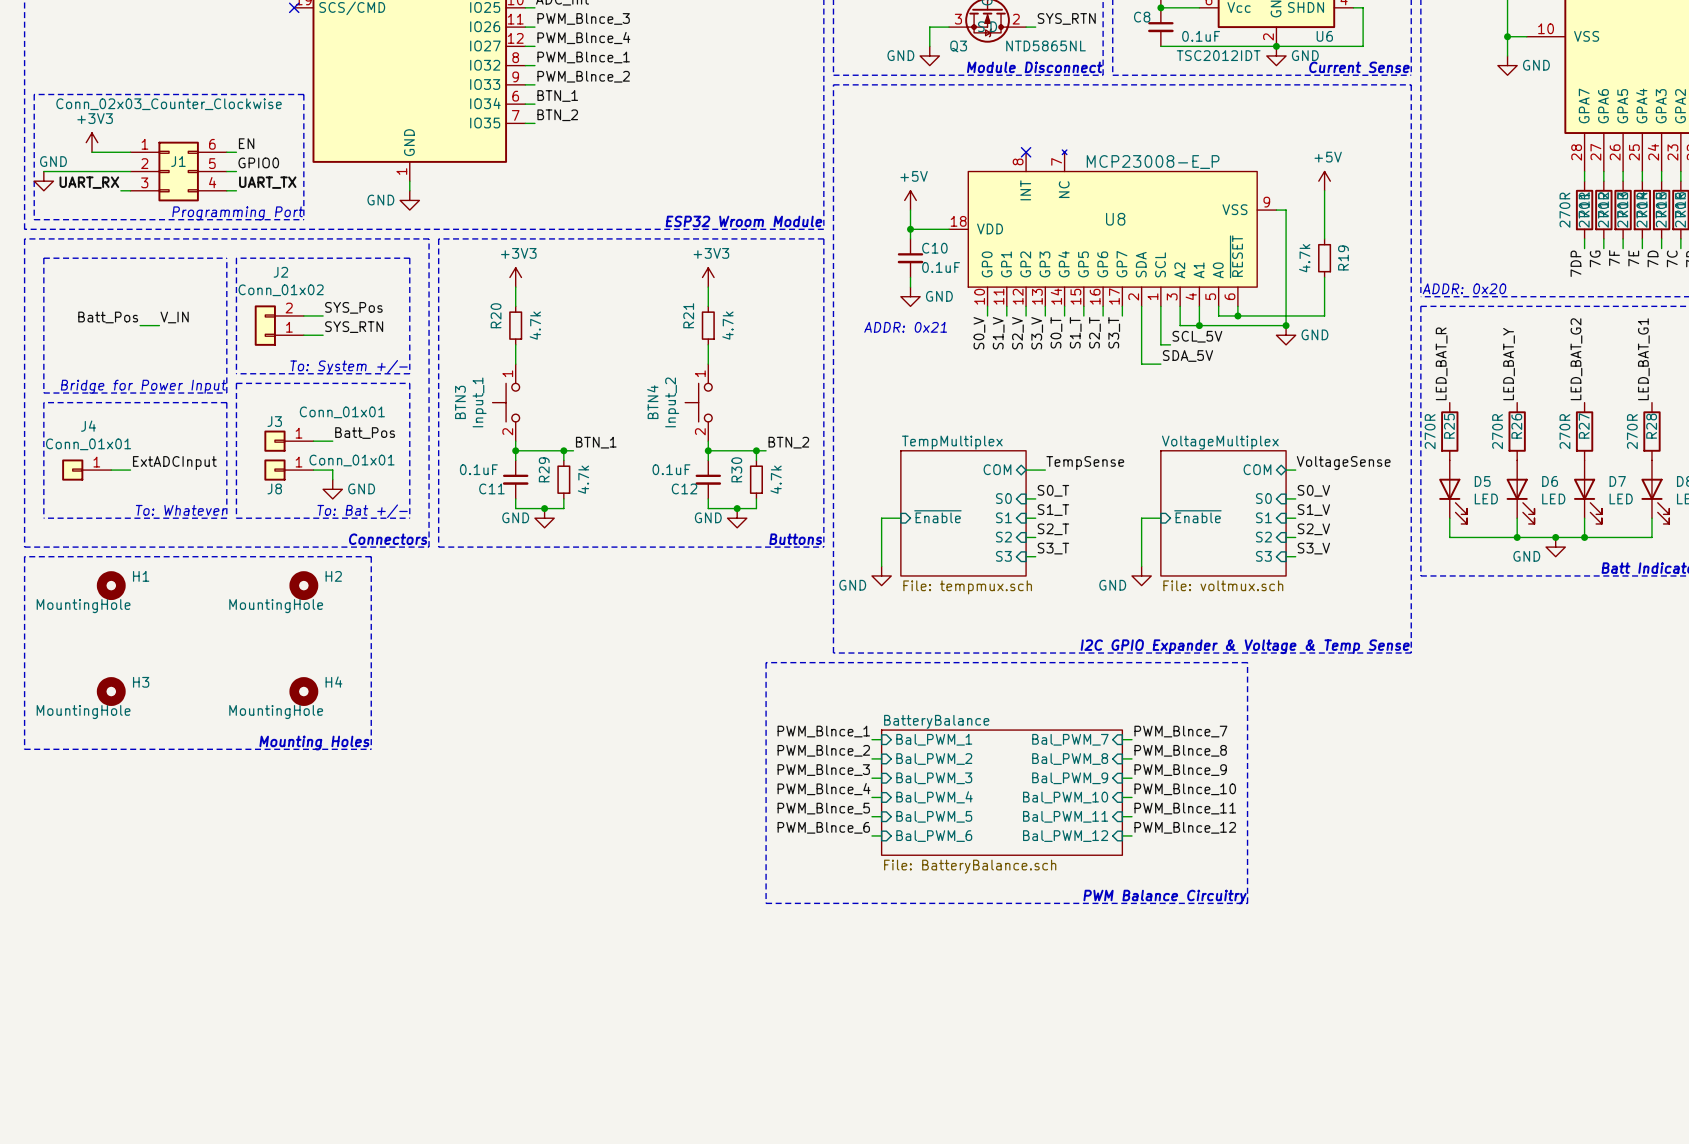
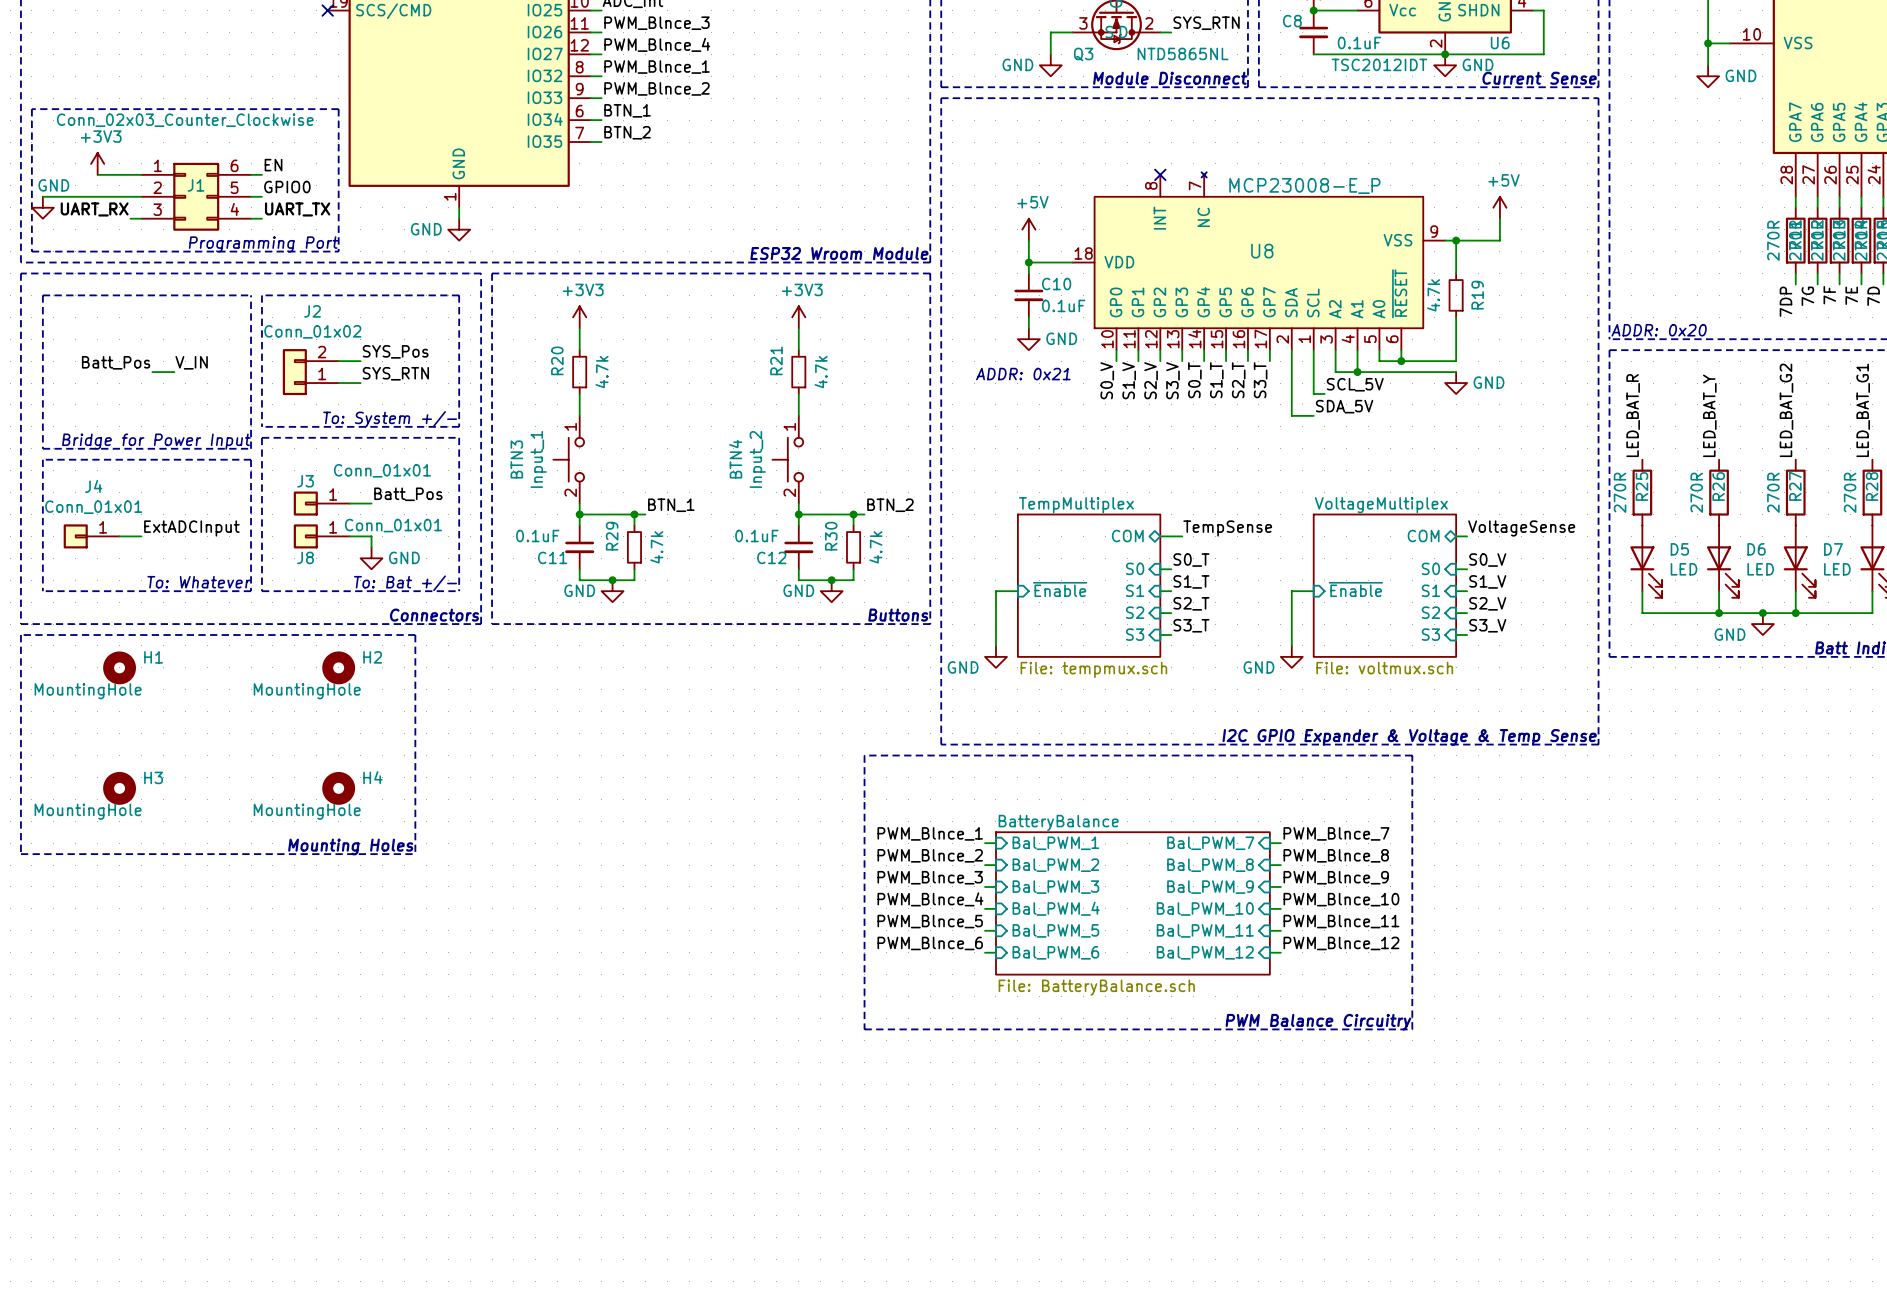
junction: none -> (1456, 240)
wire: (1324, 210) (1324, 238) -> (1499, 240) (1456, 240)
wire: (1286, 238) (1286, 277) -> none
R19 position: (1324, 258) -> (1456, 295)
wire: (1324, 277) (1324, 315) (1286, 315) (1286, 325) -> none
junction: (1286, 325) -> none

